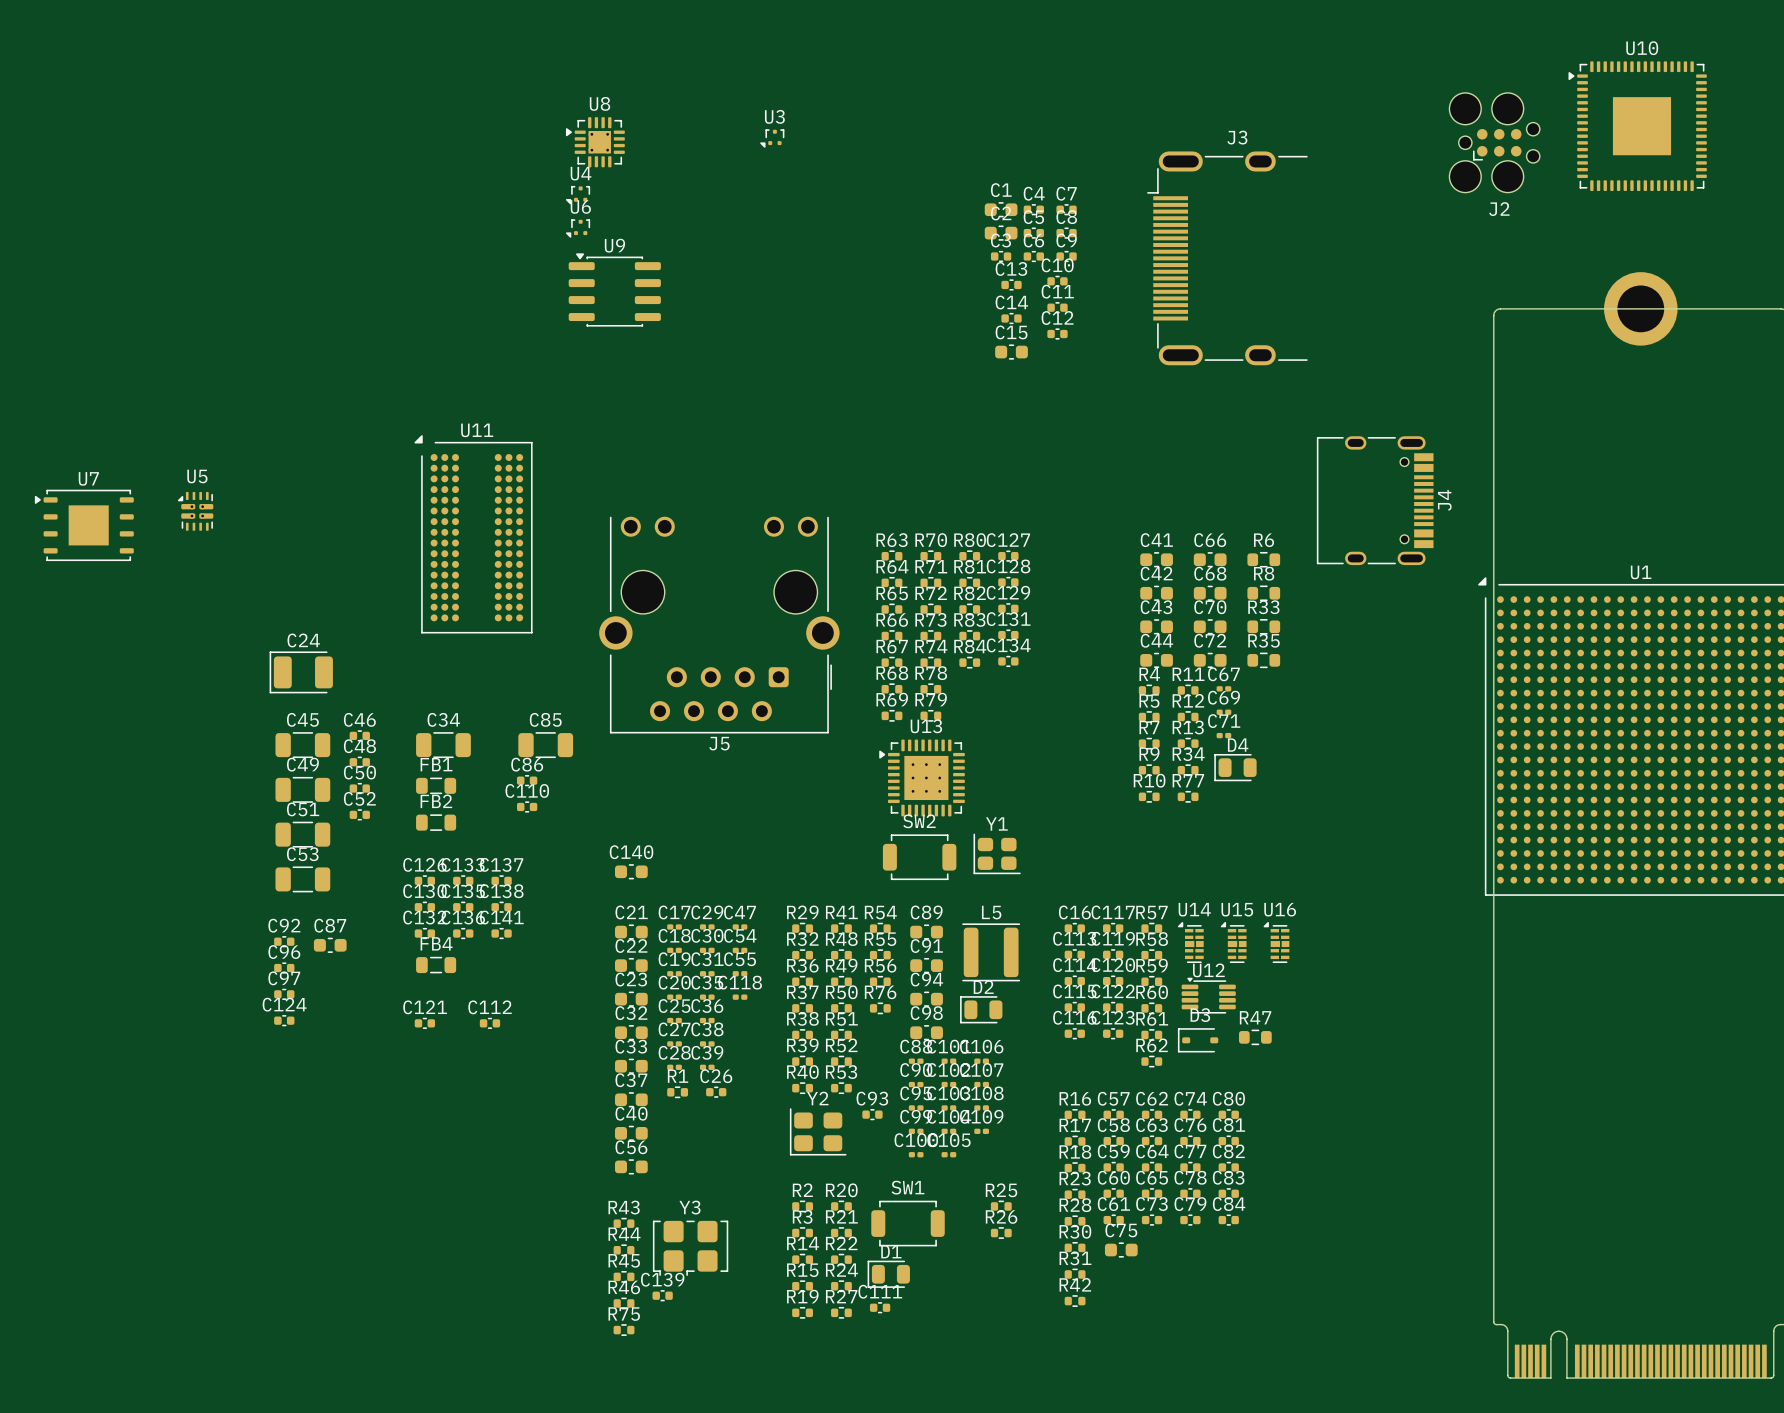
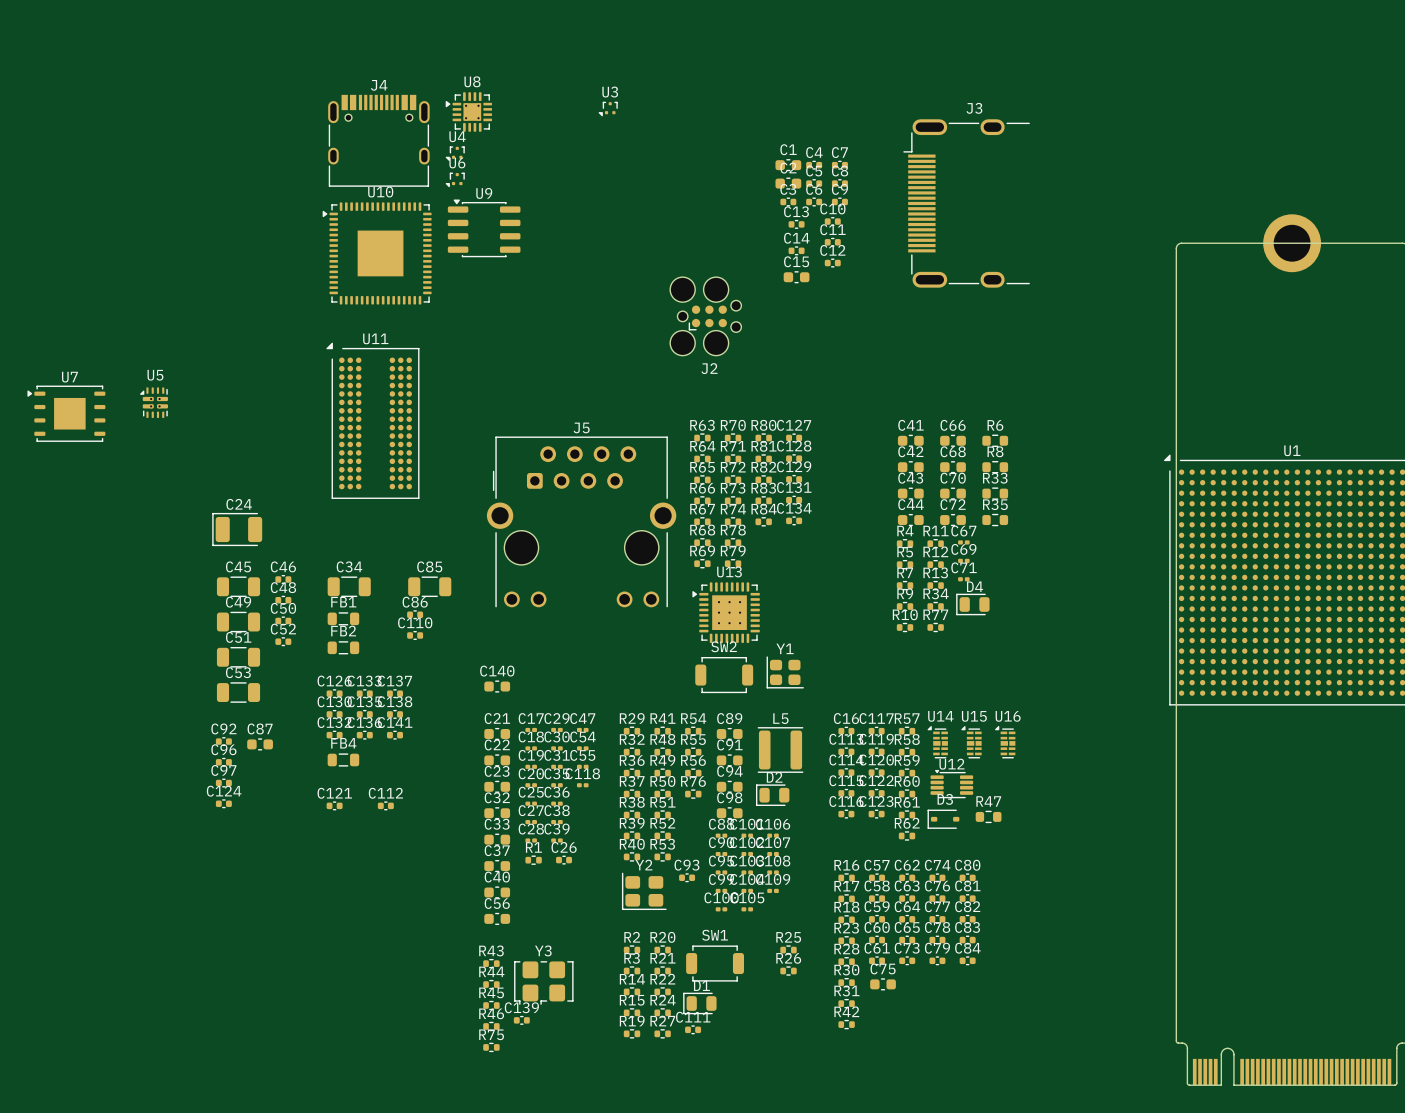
U10 position: (1637, 126) -> (377, 253)
J2 position: (1494, 142) -> (705, 316)
J4 rotation: 0° (1375, 500) -> 90° counterclockwise (378, 140)
J4 position: (1375, 500) -> (378, 140)
J5 rotation: 0° (719, 625) -> 180° (581, 521)

